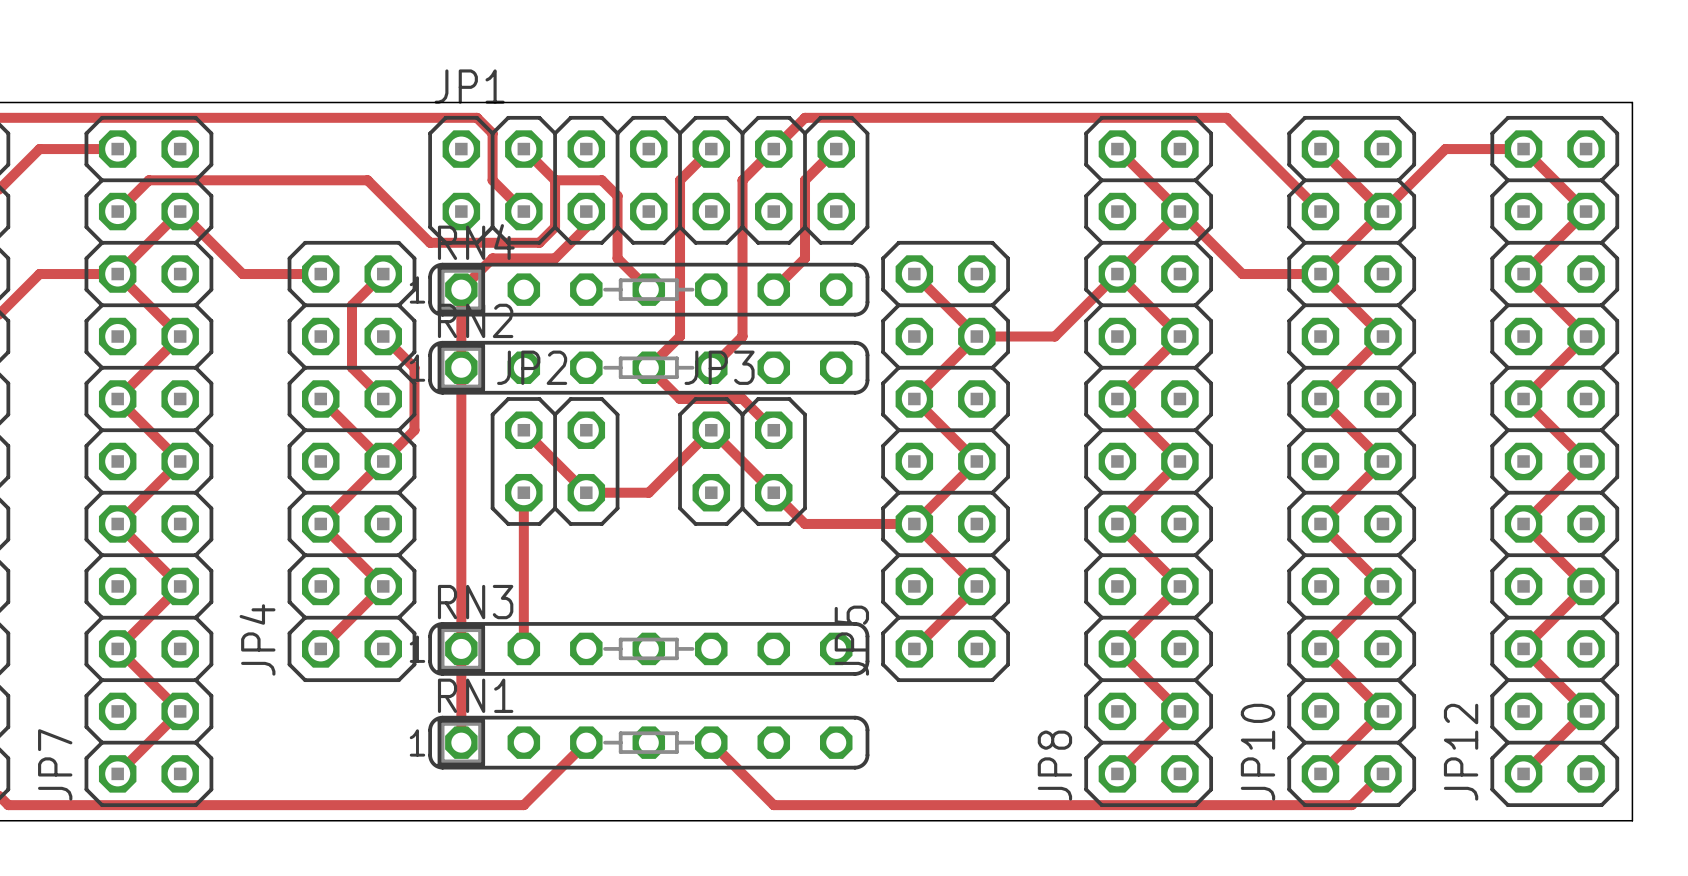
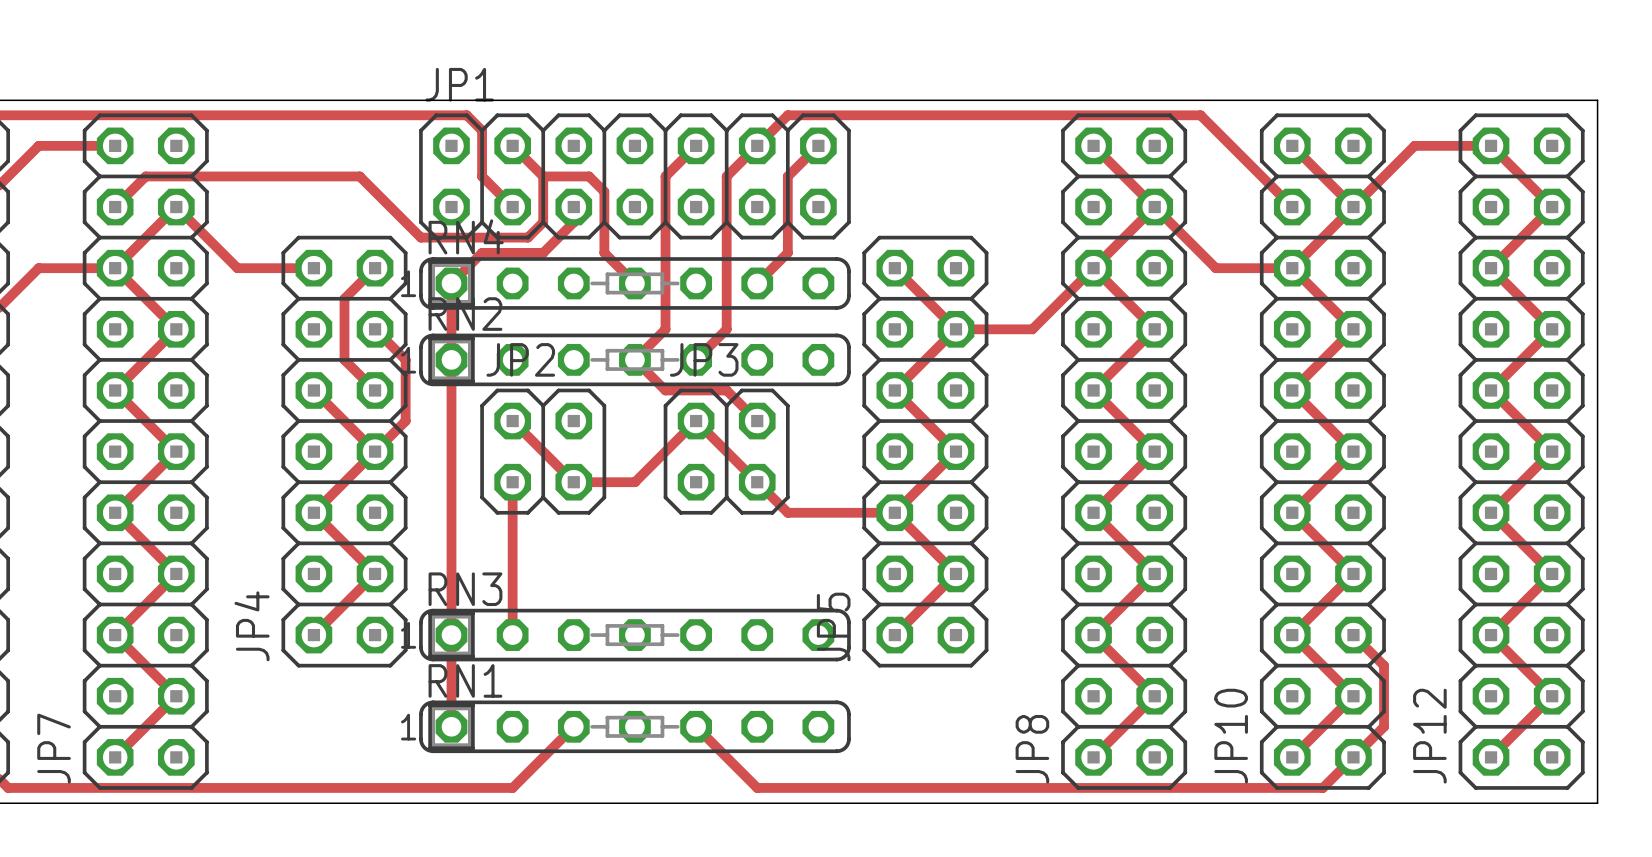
track: none -> (1353, 635) (1384, 665) (1384, 726) (1353, 757)

